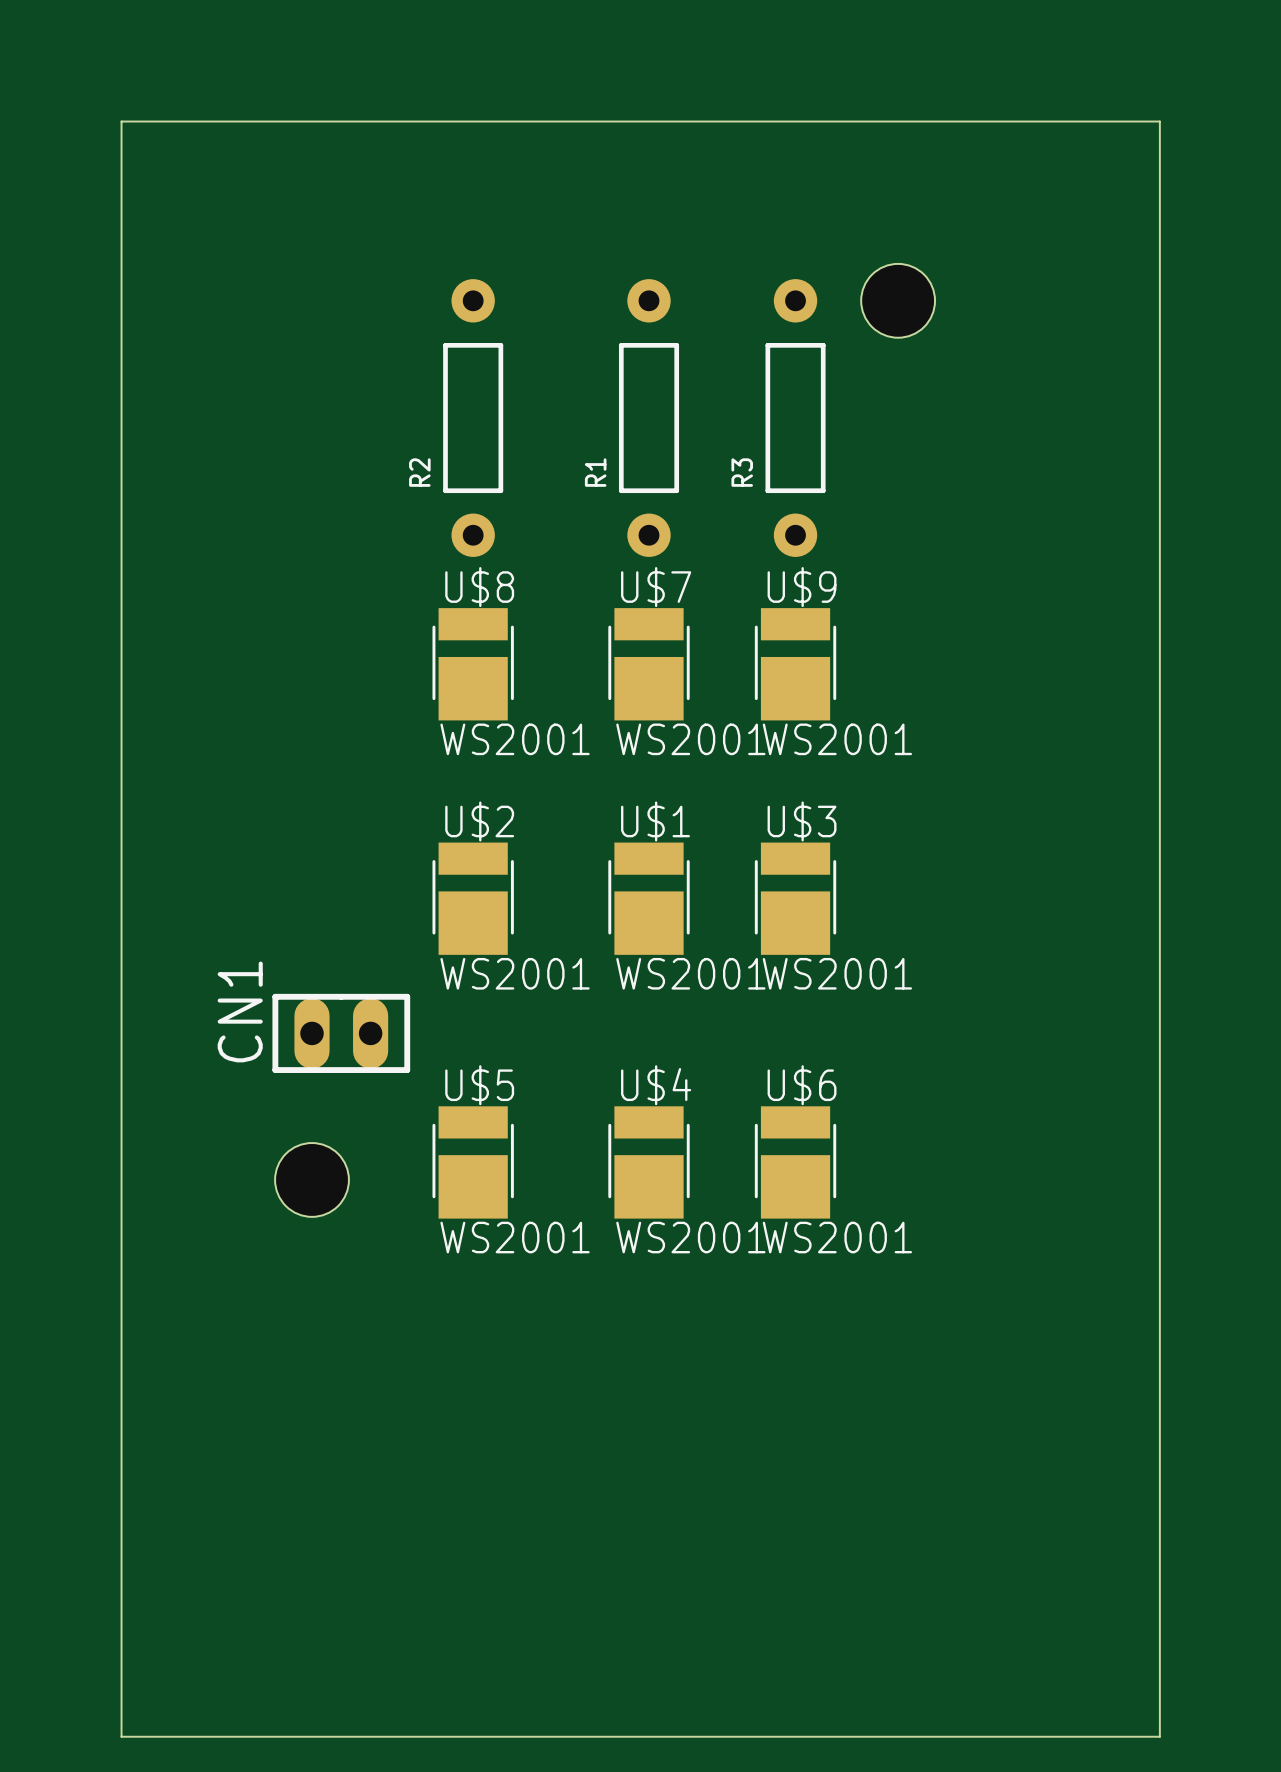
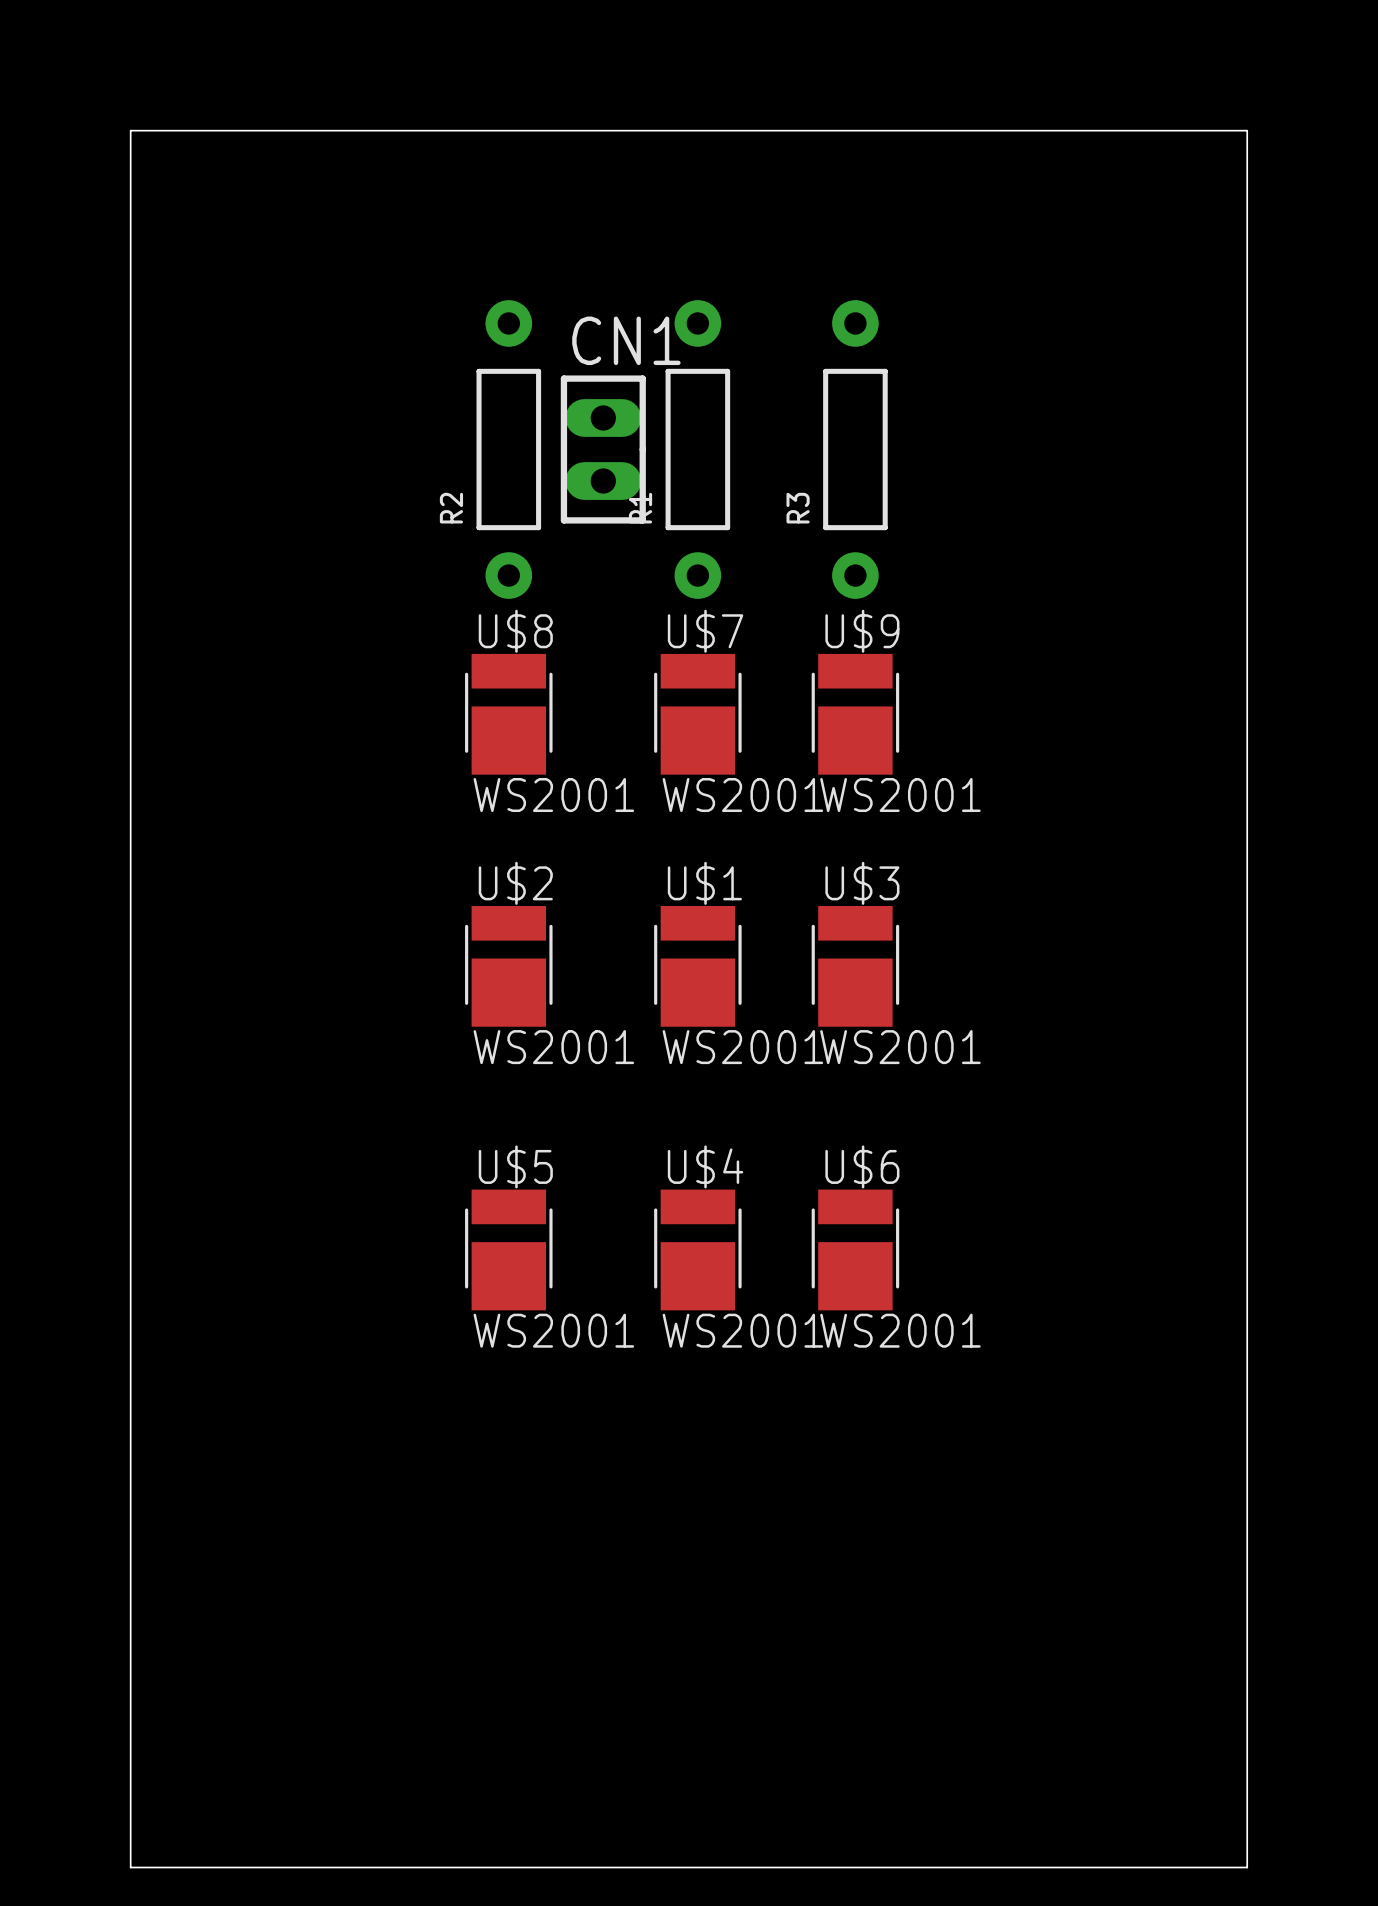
hole: (898, 300) -> none
CN1 rotation: 0° (341, 1033) -> 90° clockwise (603, 449)
CN1 position: (341, 1033) -> (603, 449)
hole: (312, 1179) -> none

